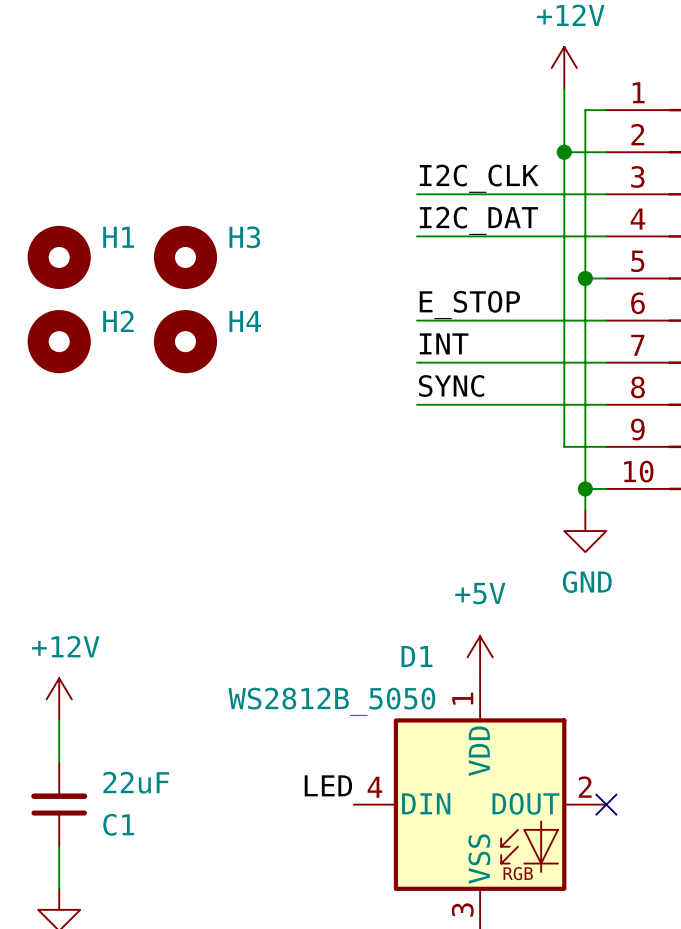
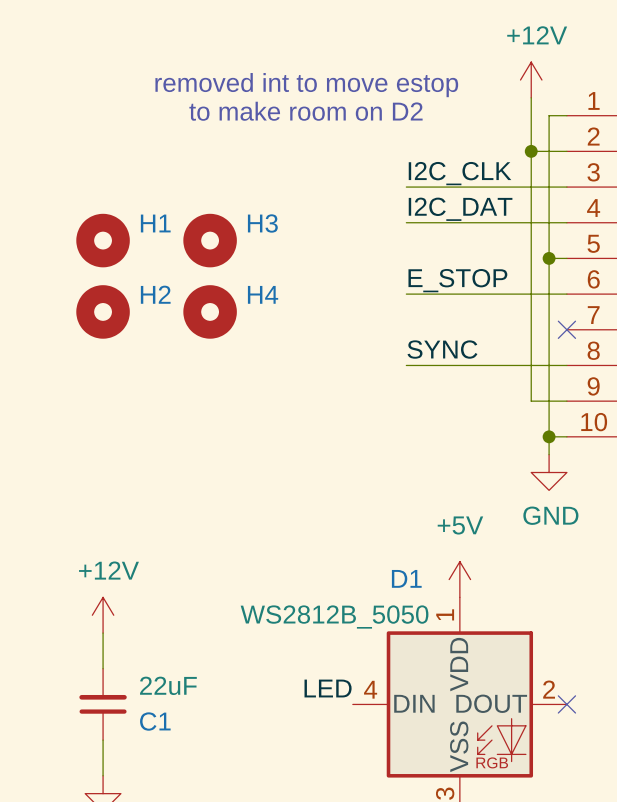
text: none -> removed int to move estop (306, 85)
text: none -> to make room on D2 (305, 111)
label: INT (444, 343) -> none
wire: (416, 362) (606, 362) -> none
no-connect mark: none -> (566, 329)

